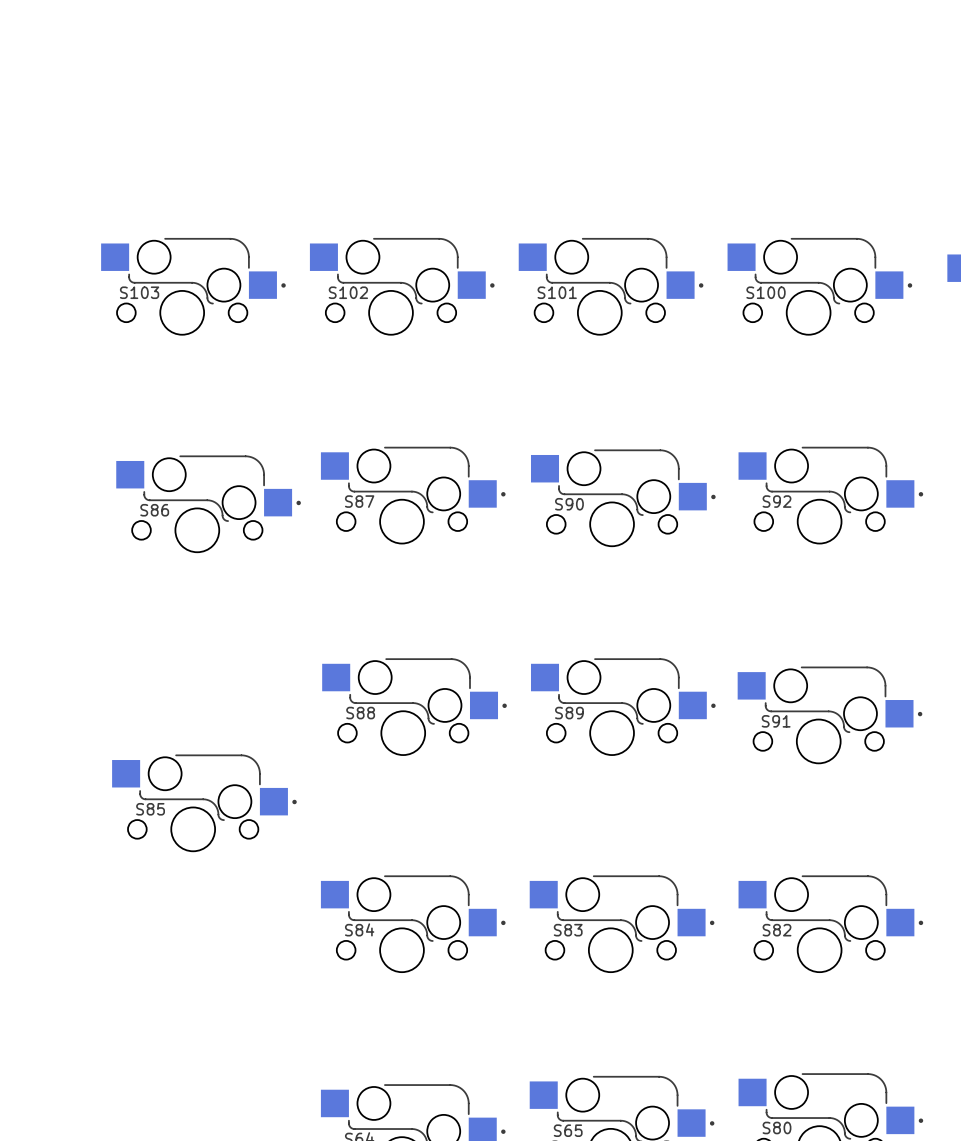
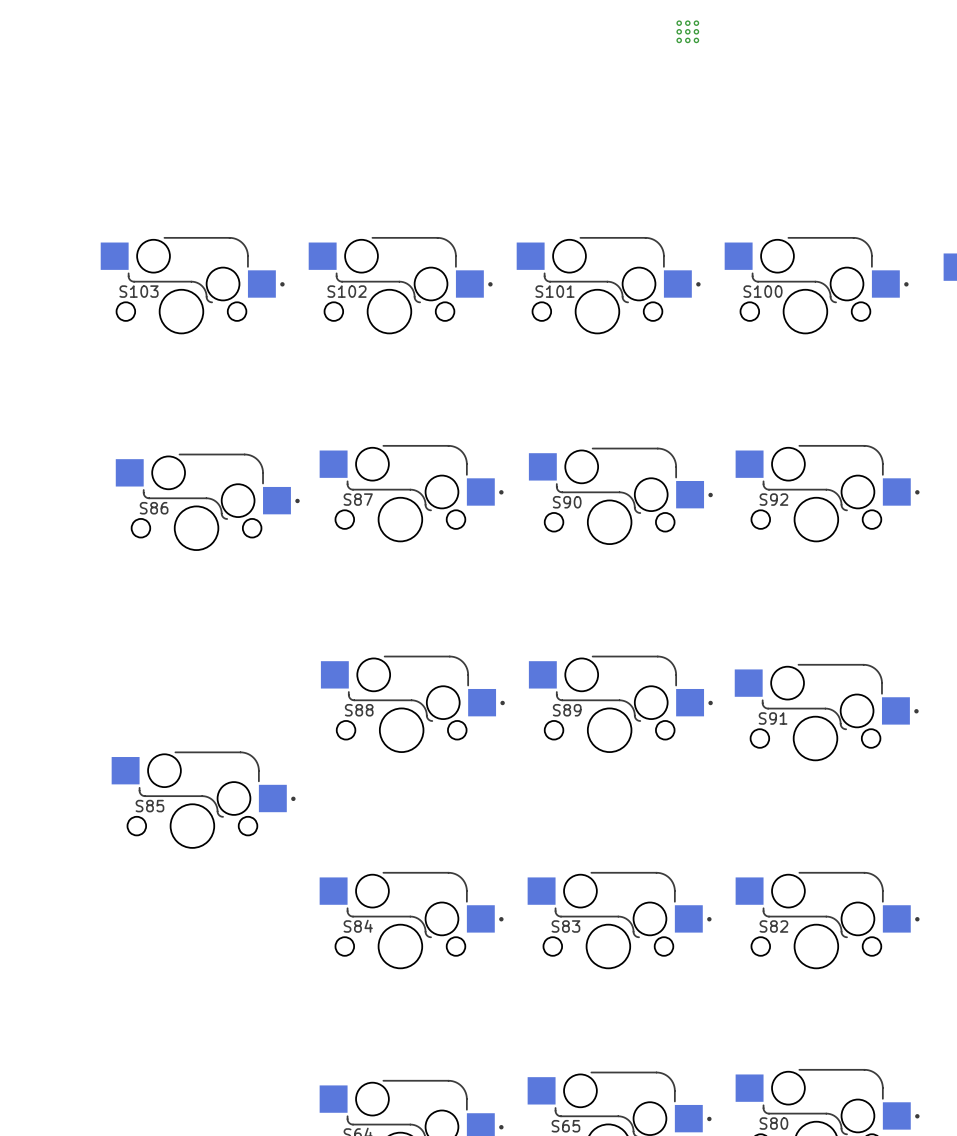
part: none -> (687, 31)

